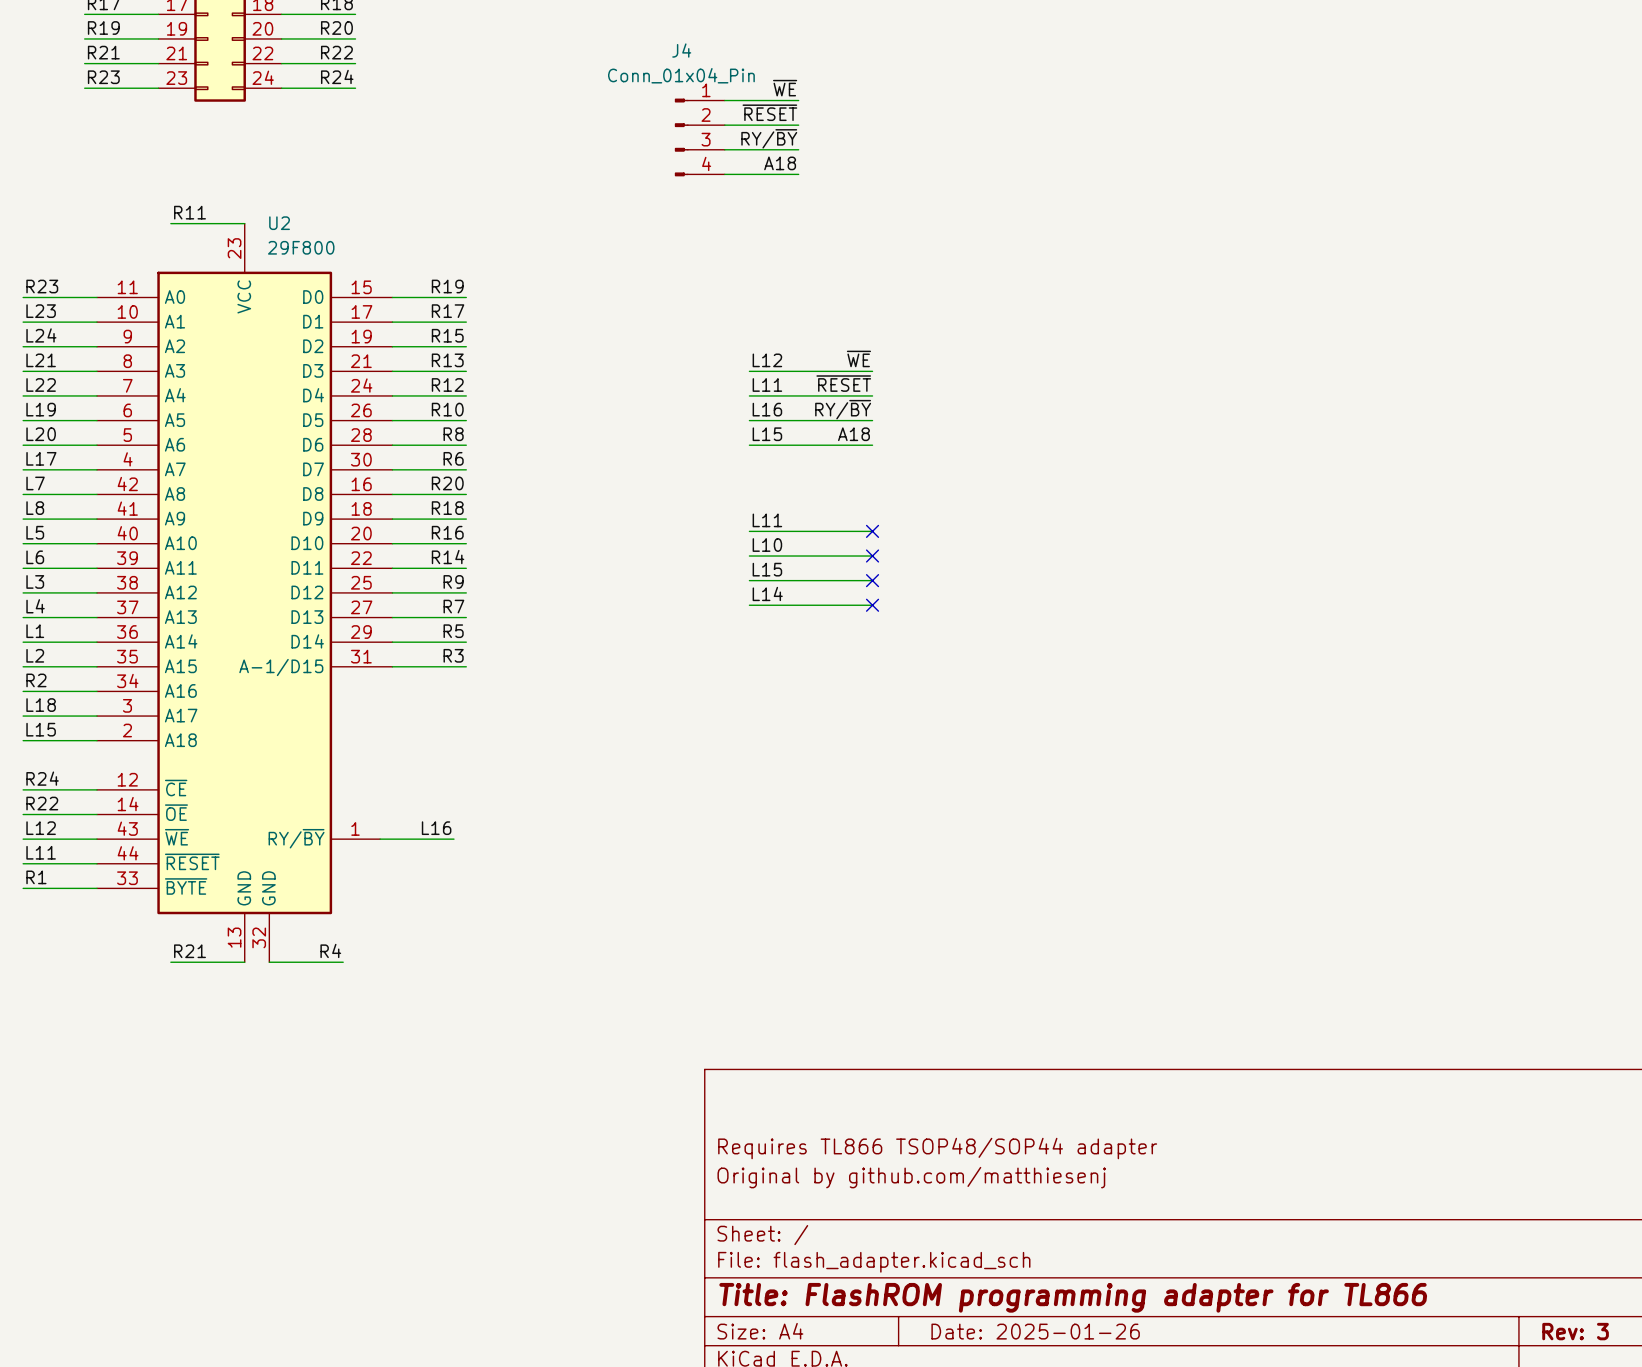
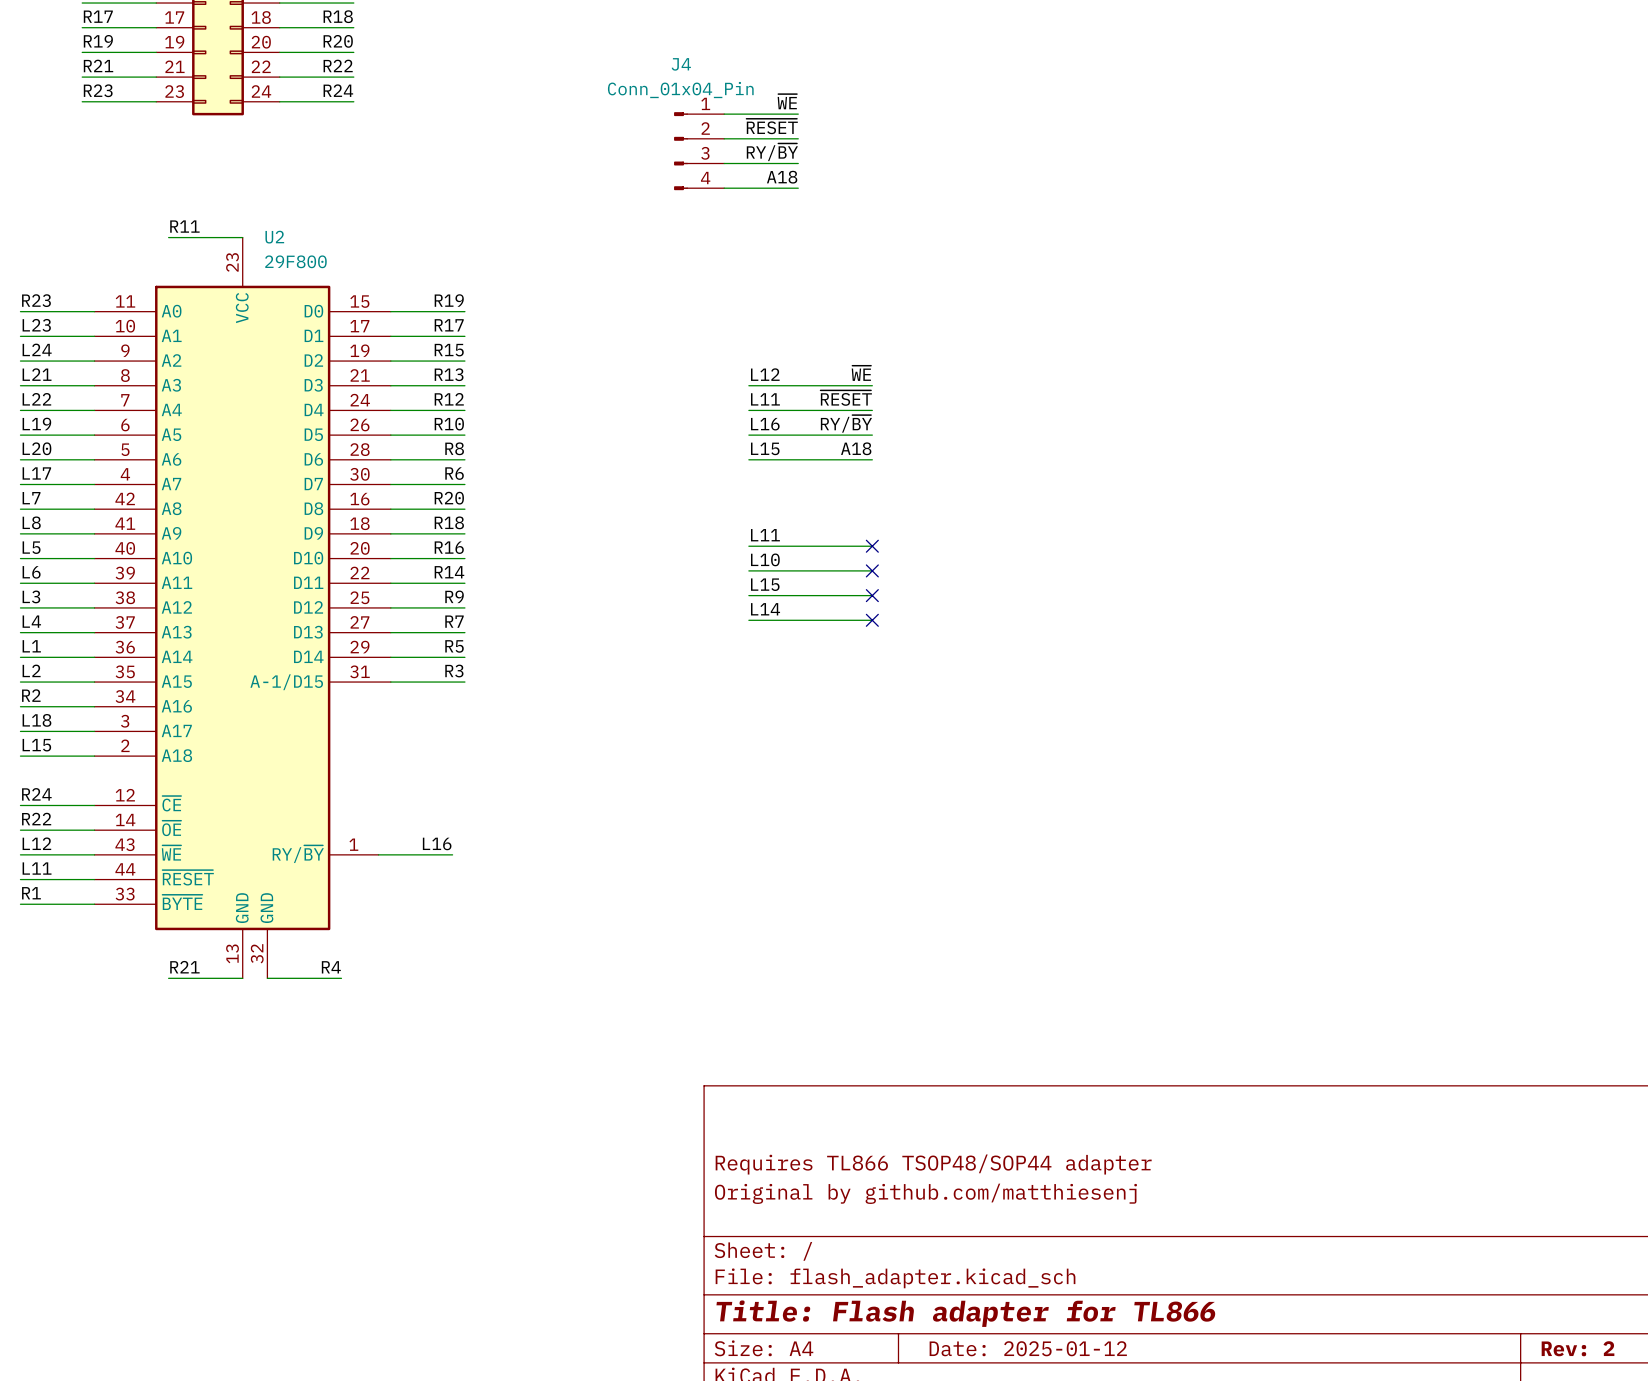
title block: Title: FlashROM programming adapter for TL866 (1073, 1297) -> Title: Flash adapter for TL866 (965, 1313)
title block: Date: 2025-01-26 (1035, 1331) -> Date: 2025-01-12 (1028, 1348)
title block: Rev: 3 (1575, 1331) -> Rev: 2 (1578, 1348)

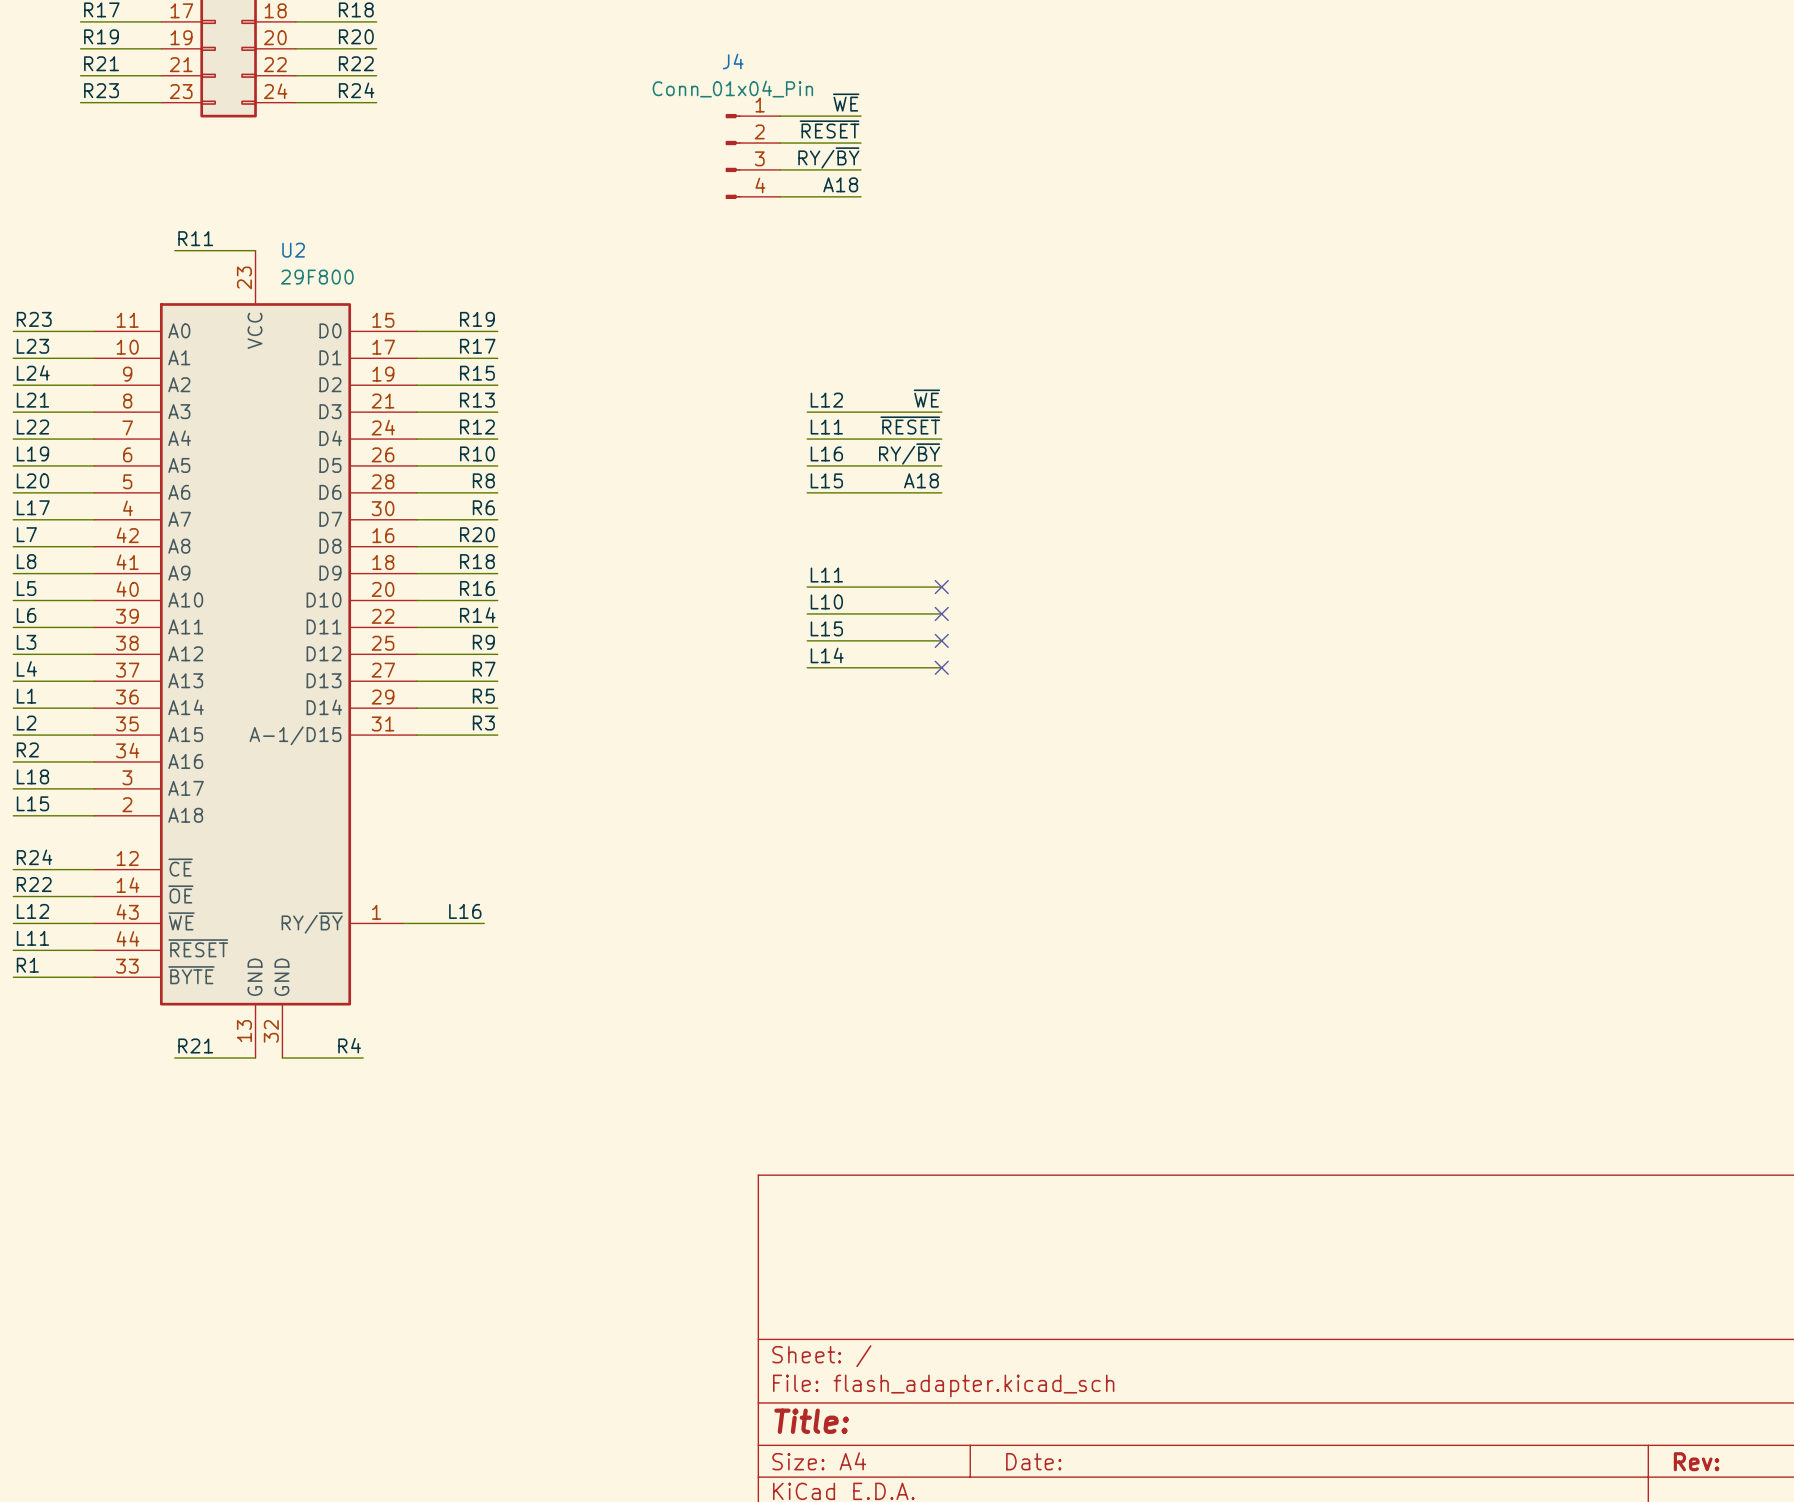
title block: Requires TL866 TSOP48/SOP44 adapter (933, 1164) -> none
title block: Original by github.com/matthiesenj (925, 1193) -> none
title block: Title: Flash adapter for TL866 (965, 1313) -> Title: (811, 1421)
title block: Date: 2025-01-12 (1028, 1348) -> Date: (1033, 1461)
title block: Rev: 2 (1578, 1348) -> Rev: (1696, 1461)

